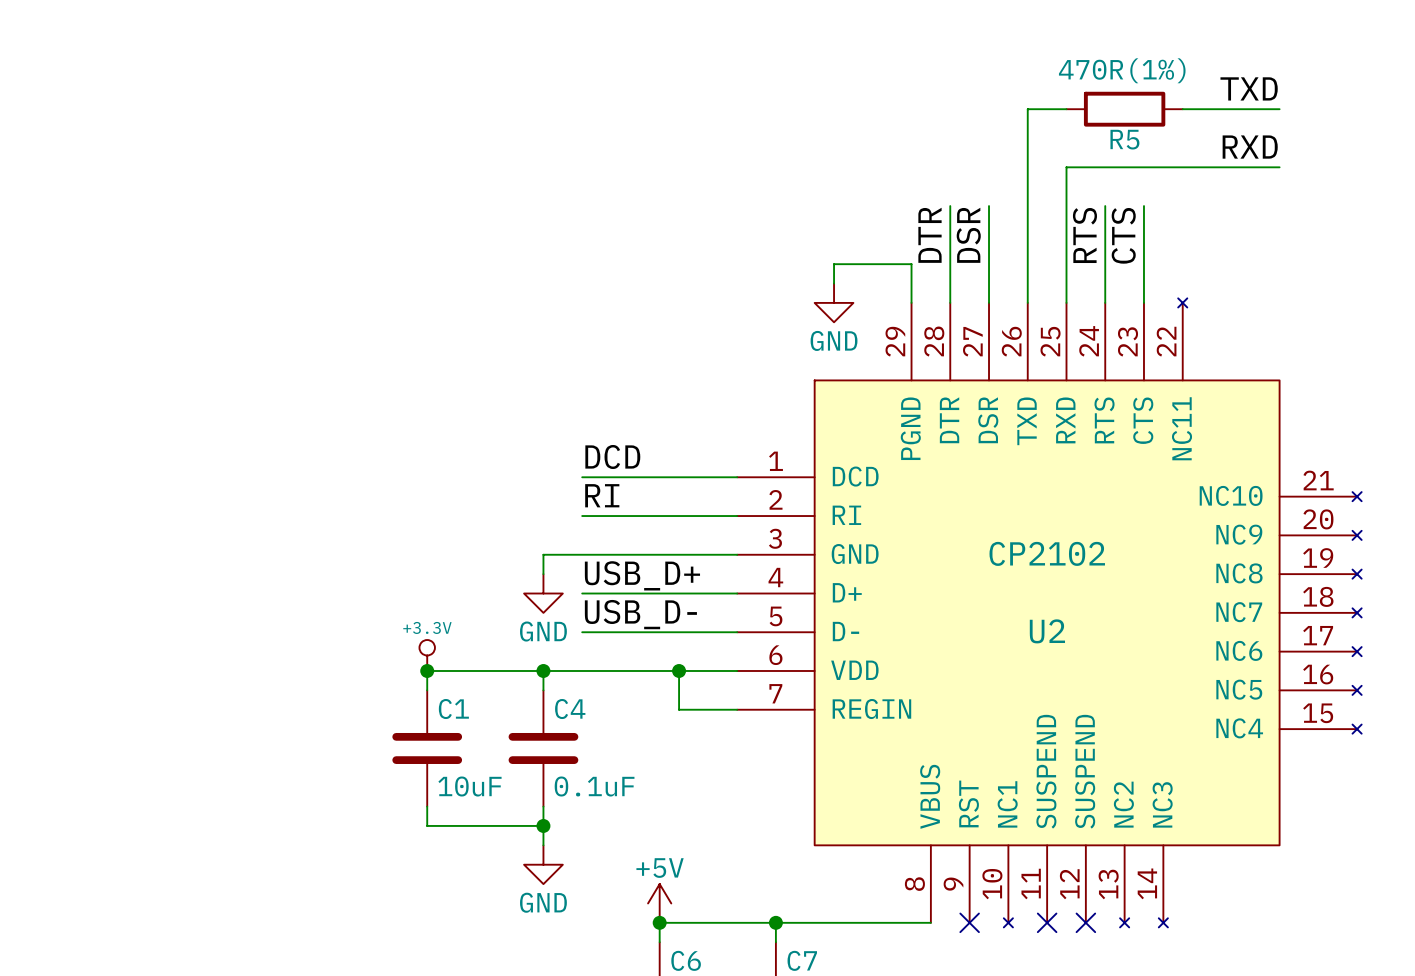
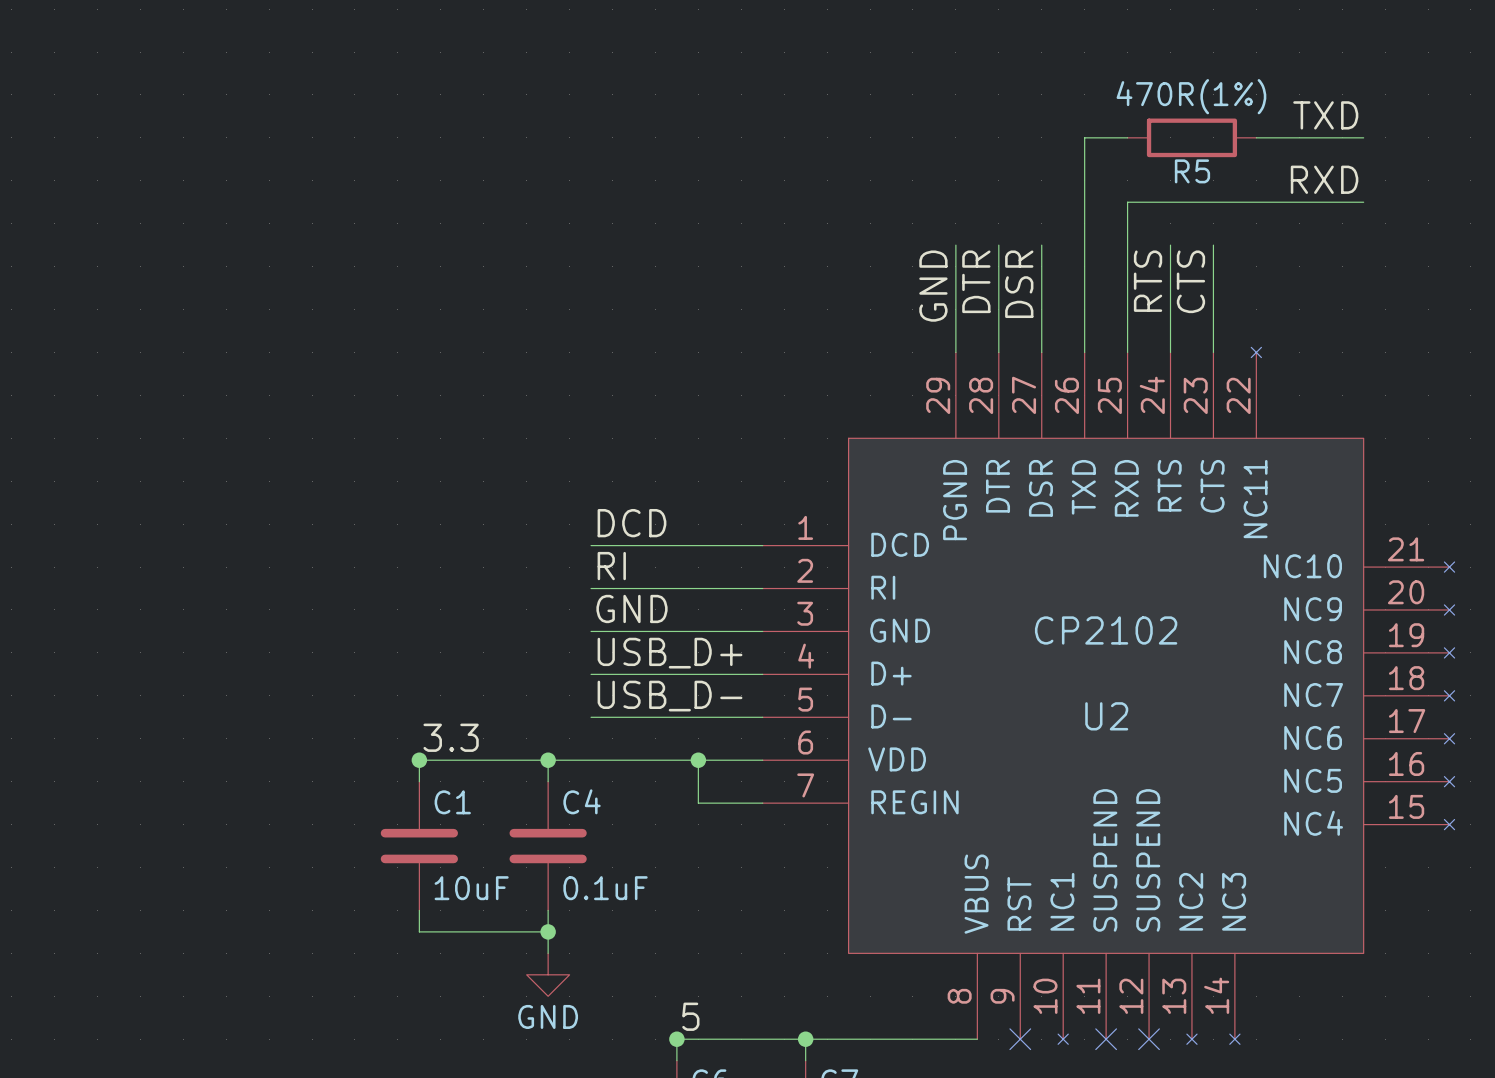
label: none -> GND (933, 286)
wire: (911, 264) (834, 264) (834, 283) -> (955, 309) (955, 245)
power symbol: GND (834, 302) -> none
label: none -> GND (631, 608)
wire: (582, 554) (543, 554) (543, 574) -> none
power symbol: GND (543, 593) -> none
label: none -> 3.3 (451, 737)
power symbol: +3.3V (427, 655) -> none
label: none -> 5 (690, 1016)
power symbol: +5V (659, 903) -> none

